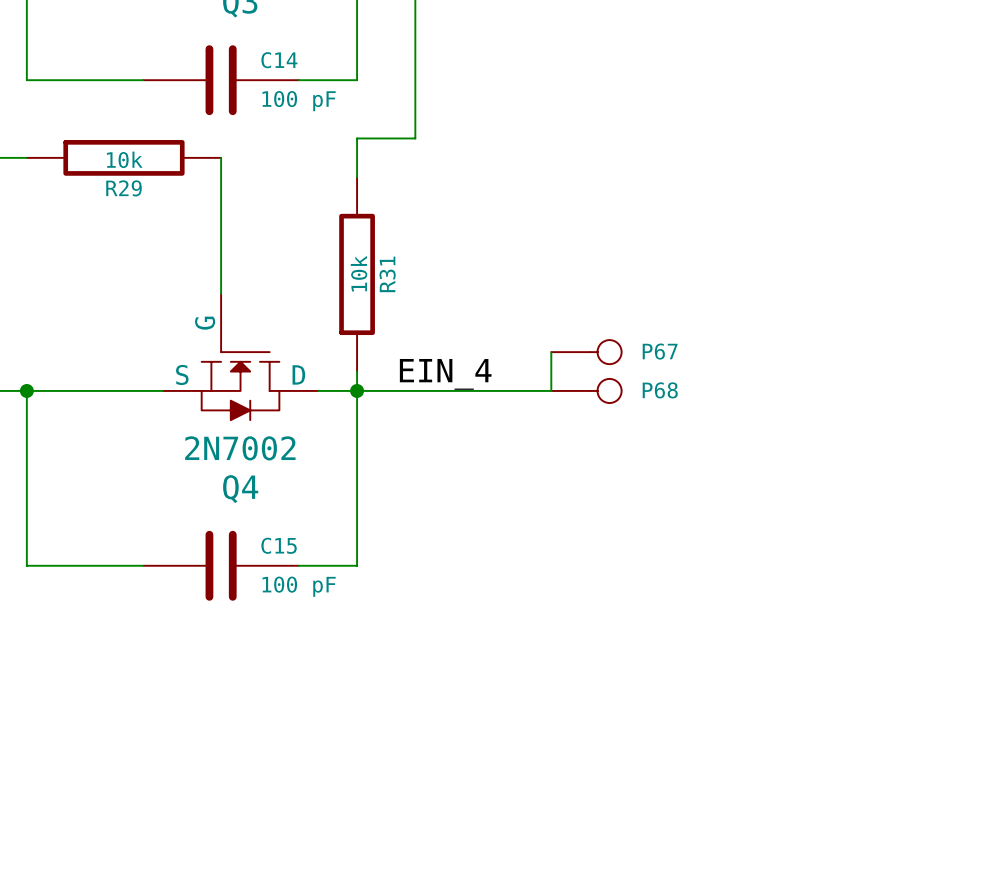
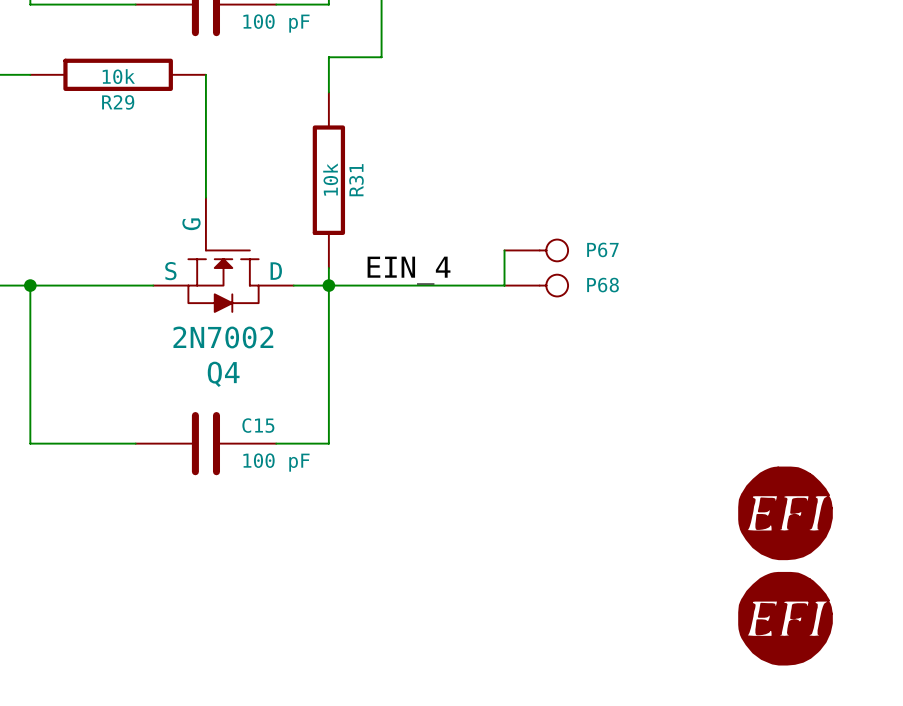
power symbol: none -> (785, 513)
power symbol: none -> (785, 618)

